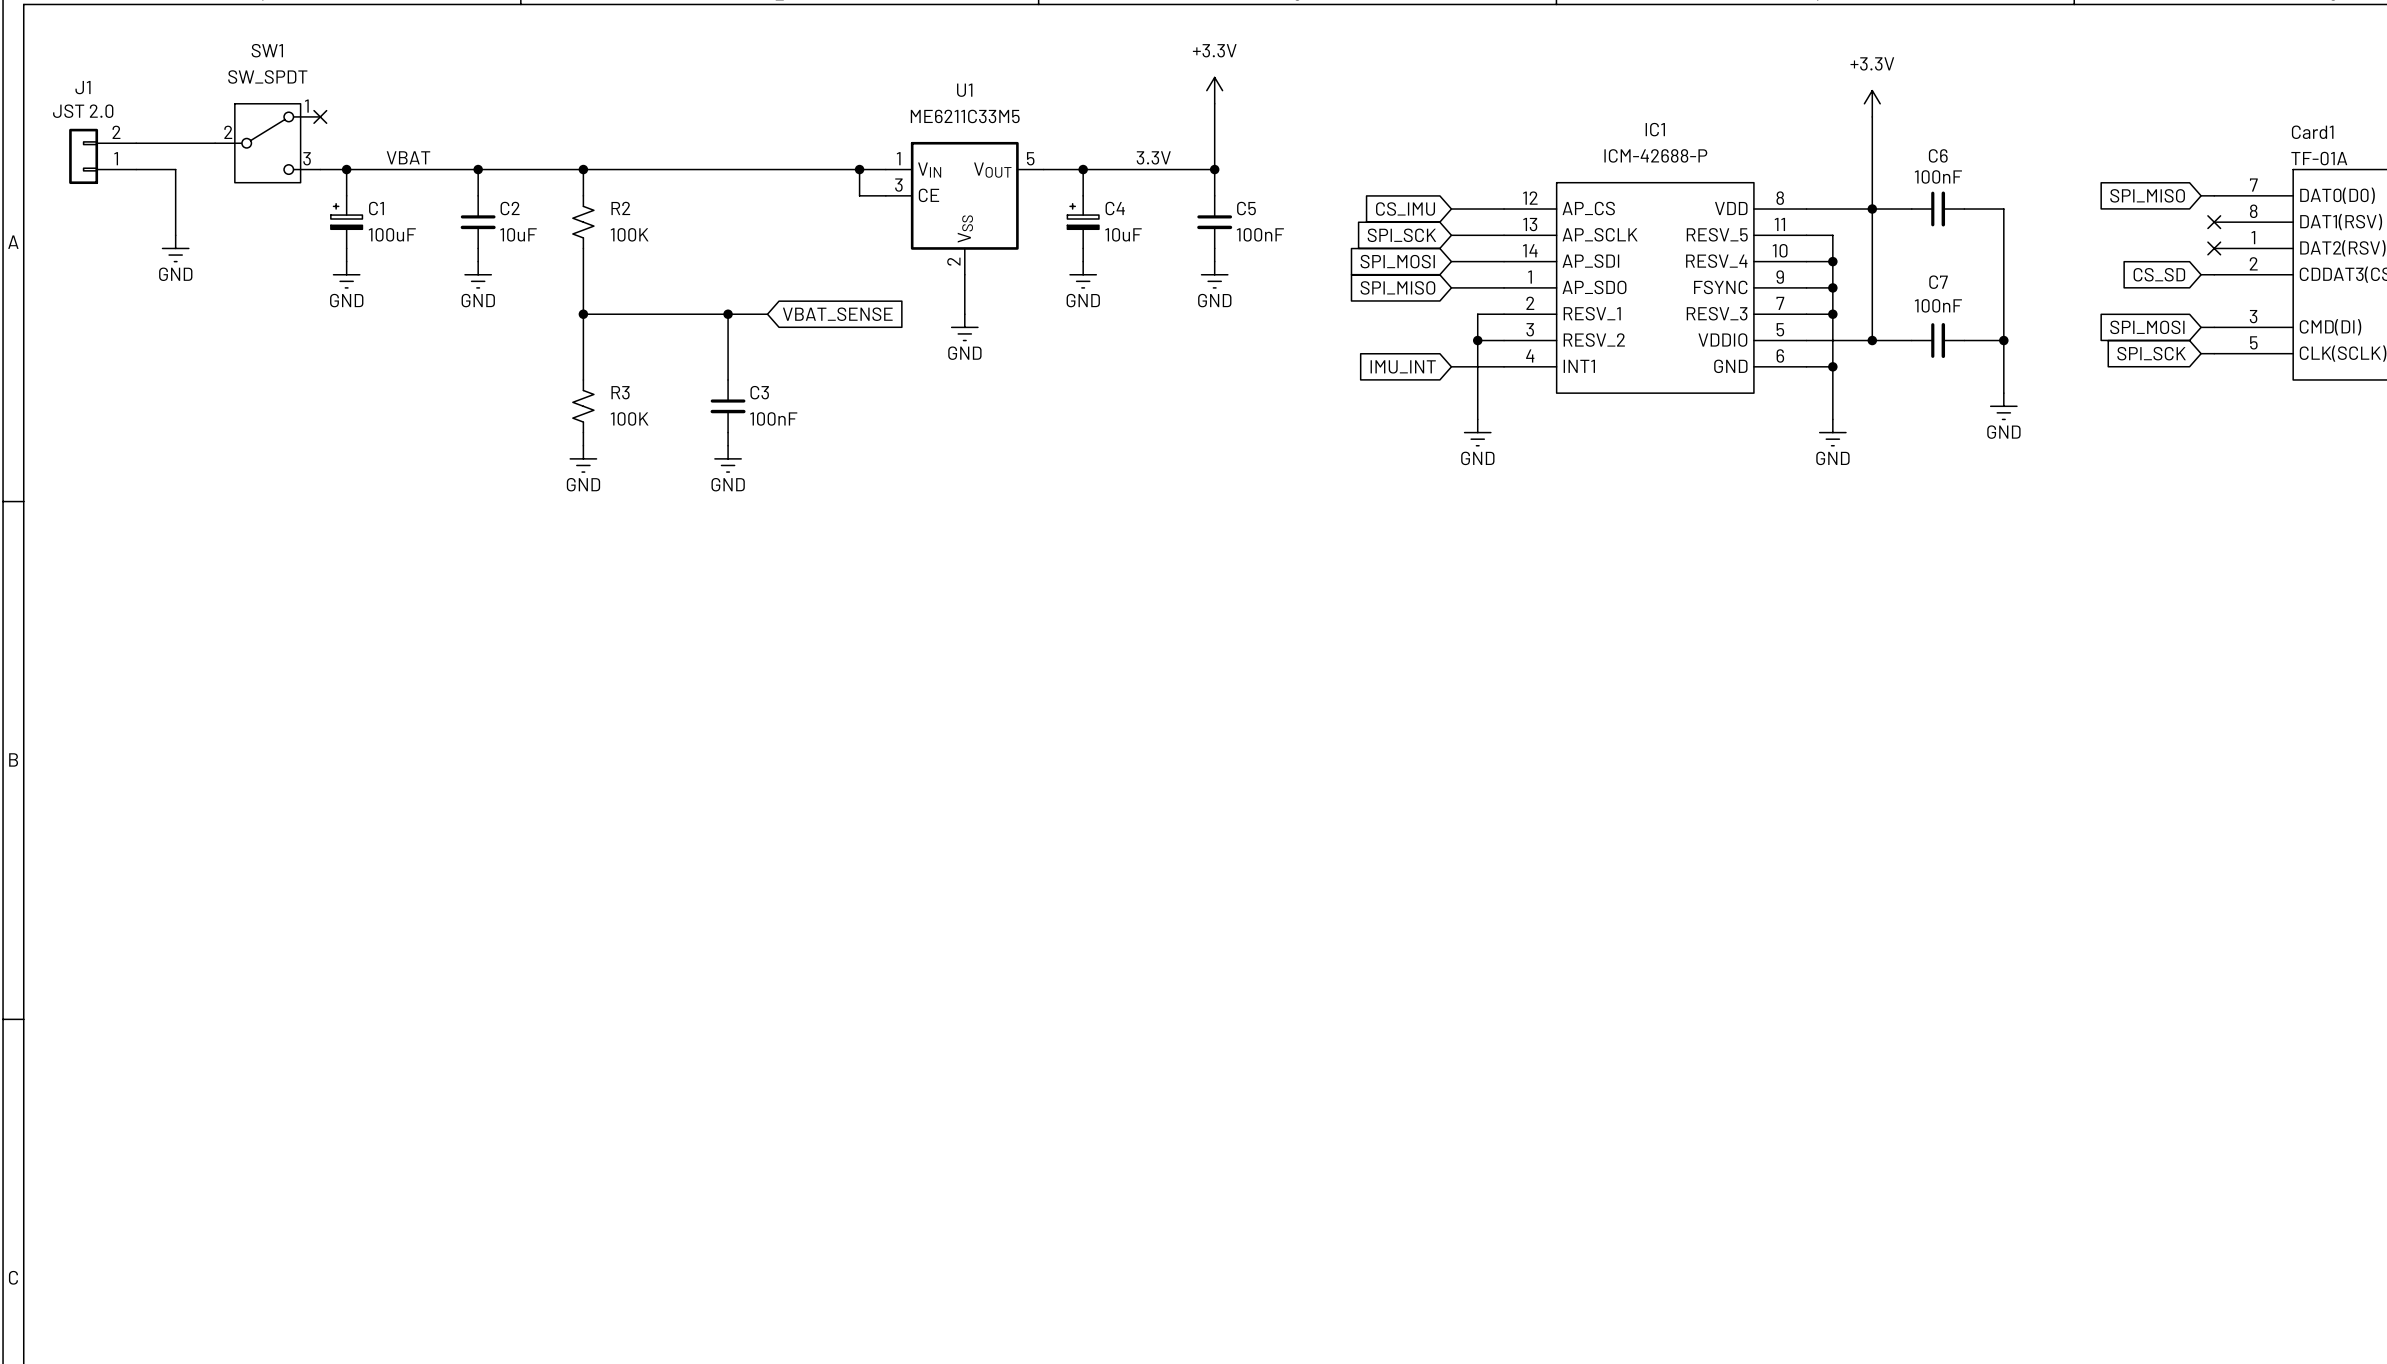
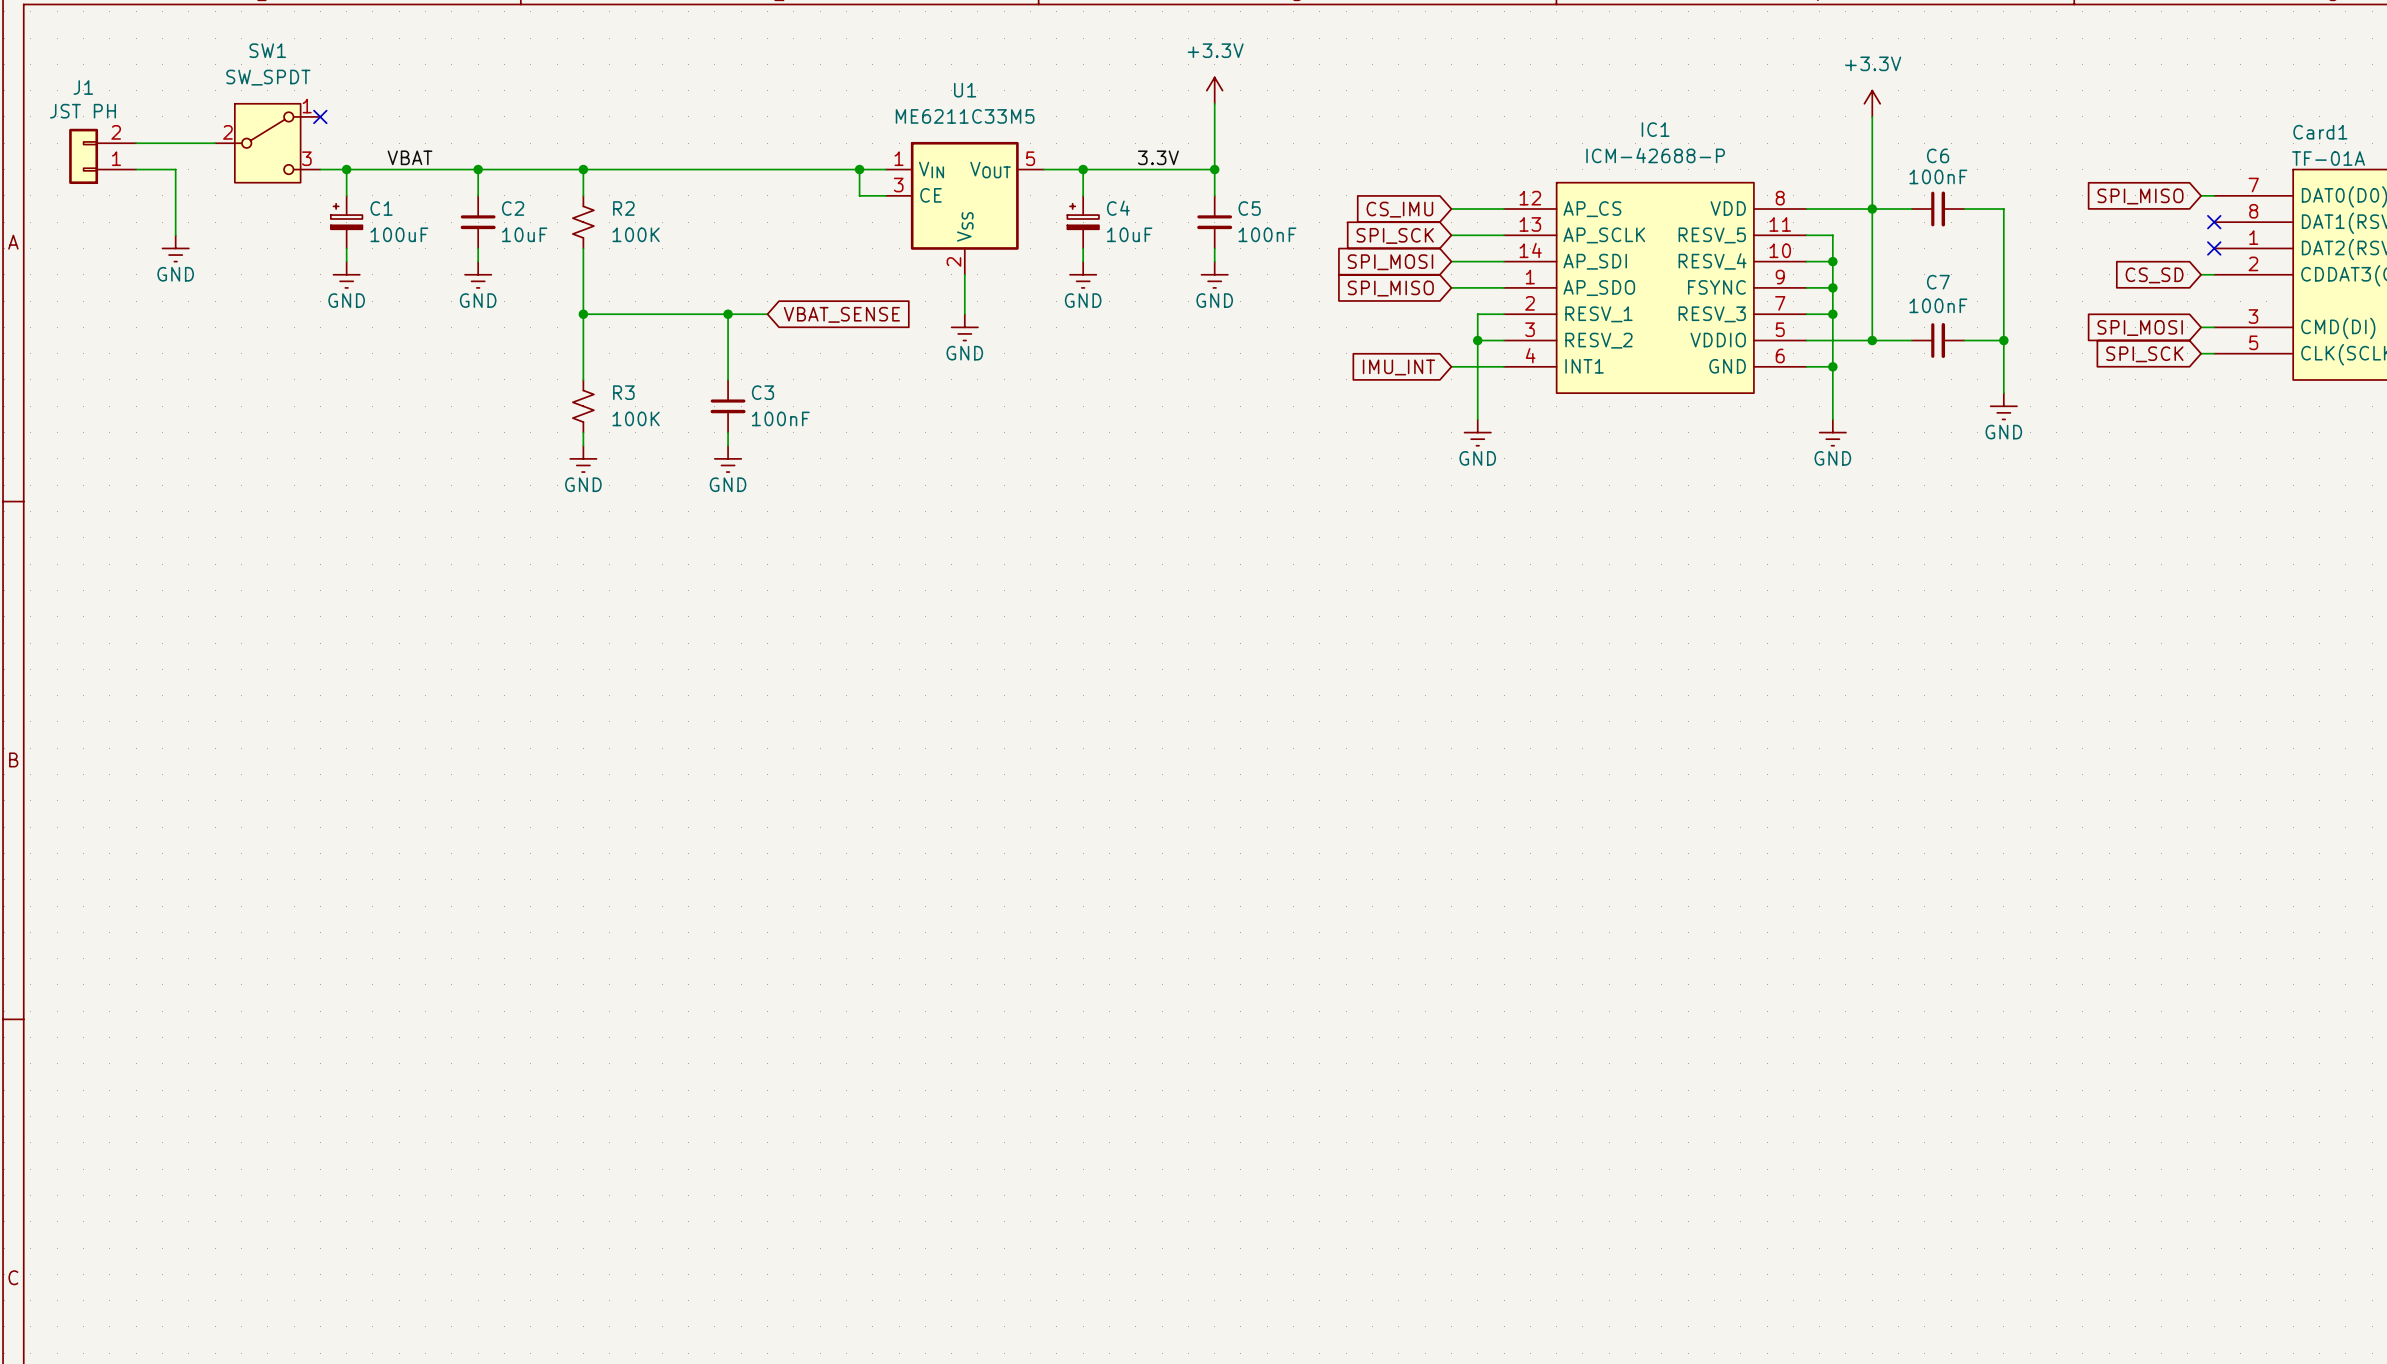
J1 value: JST 2.0 (83, 111) -> JST PH (82, 111)

